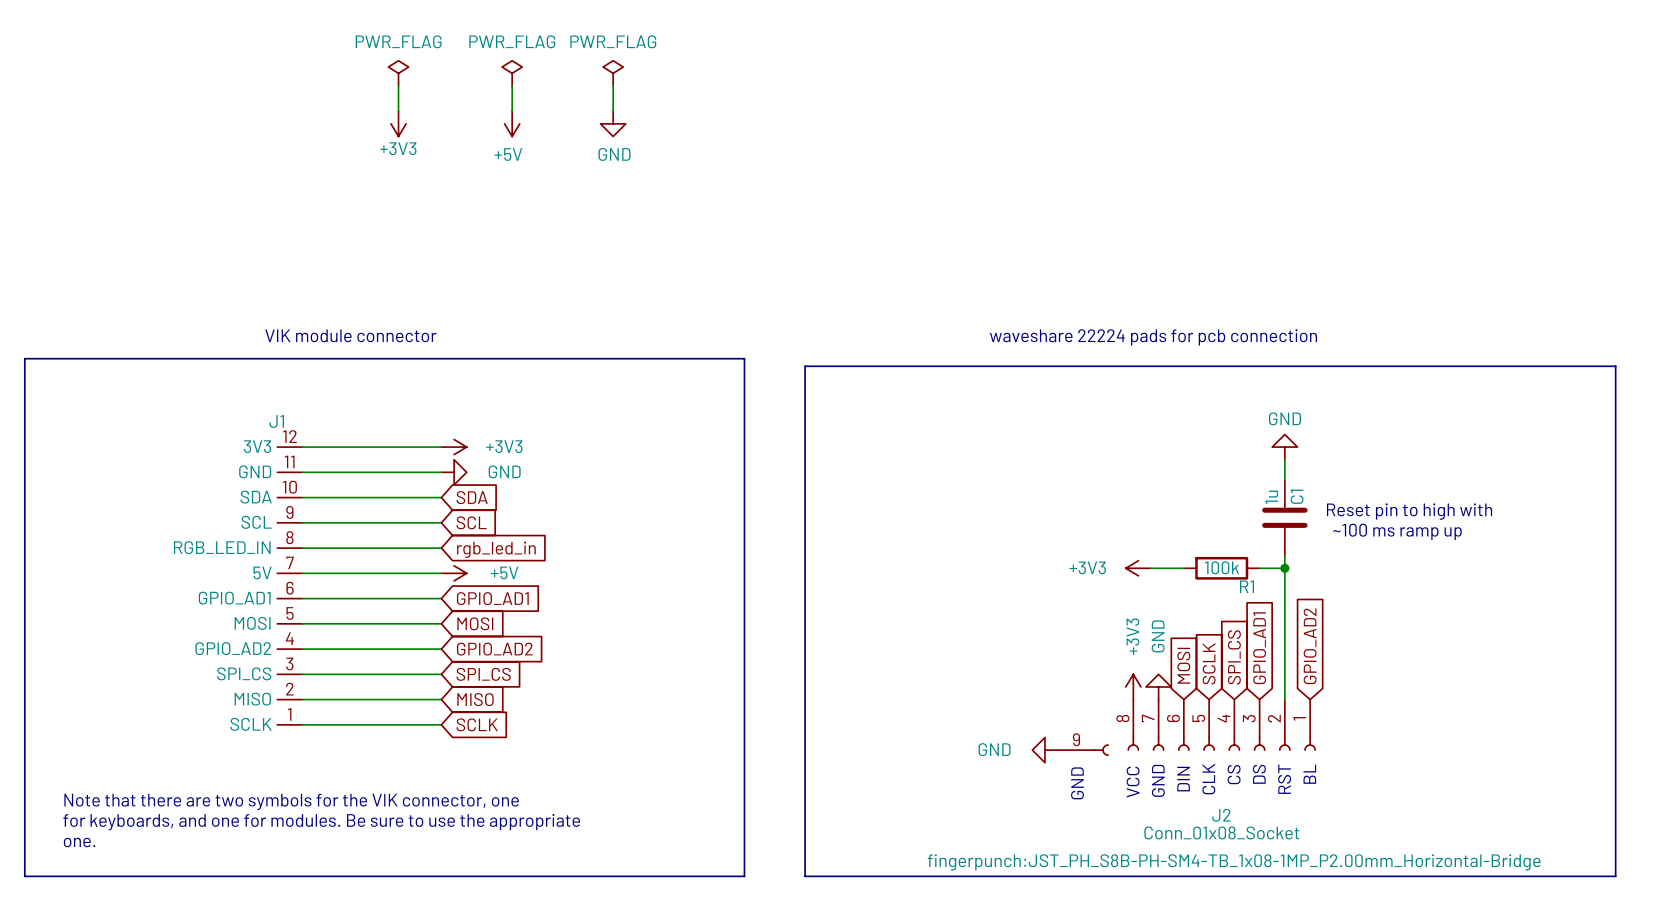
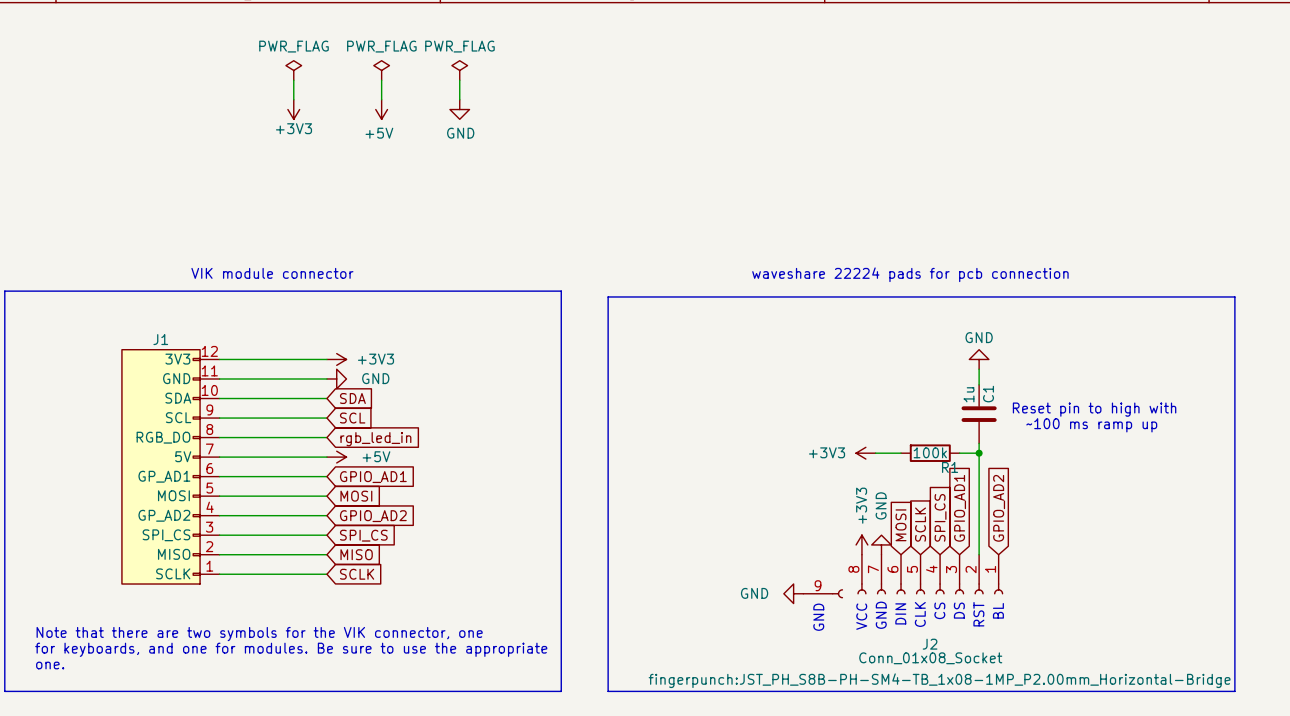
J1 symbol: [277, 447, 303, 725] -> [121, 349, 220, 585]

